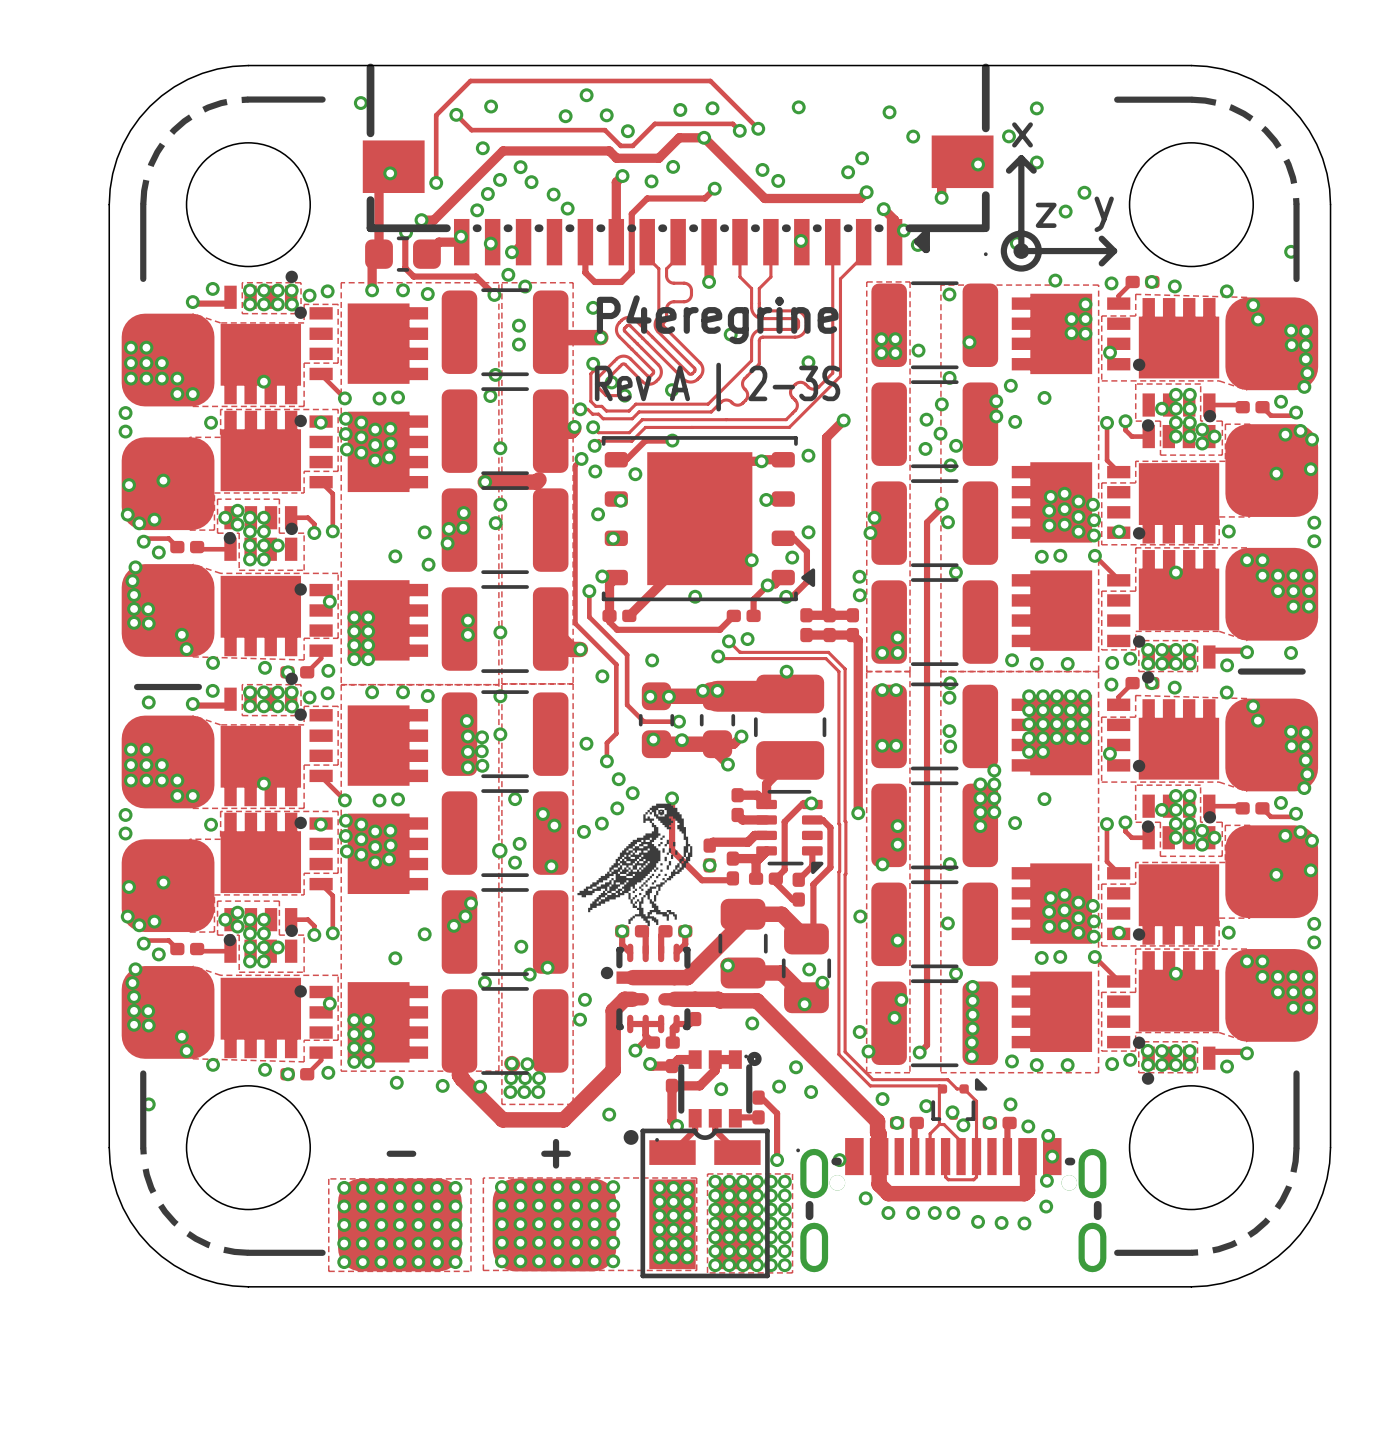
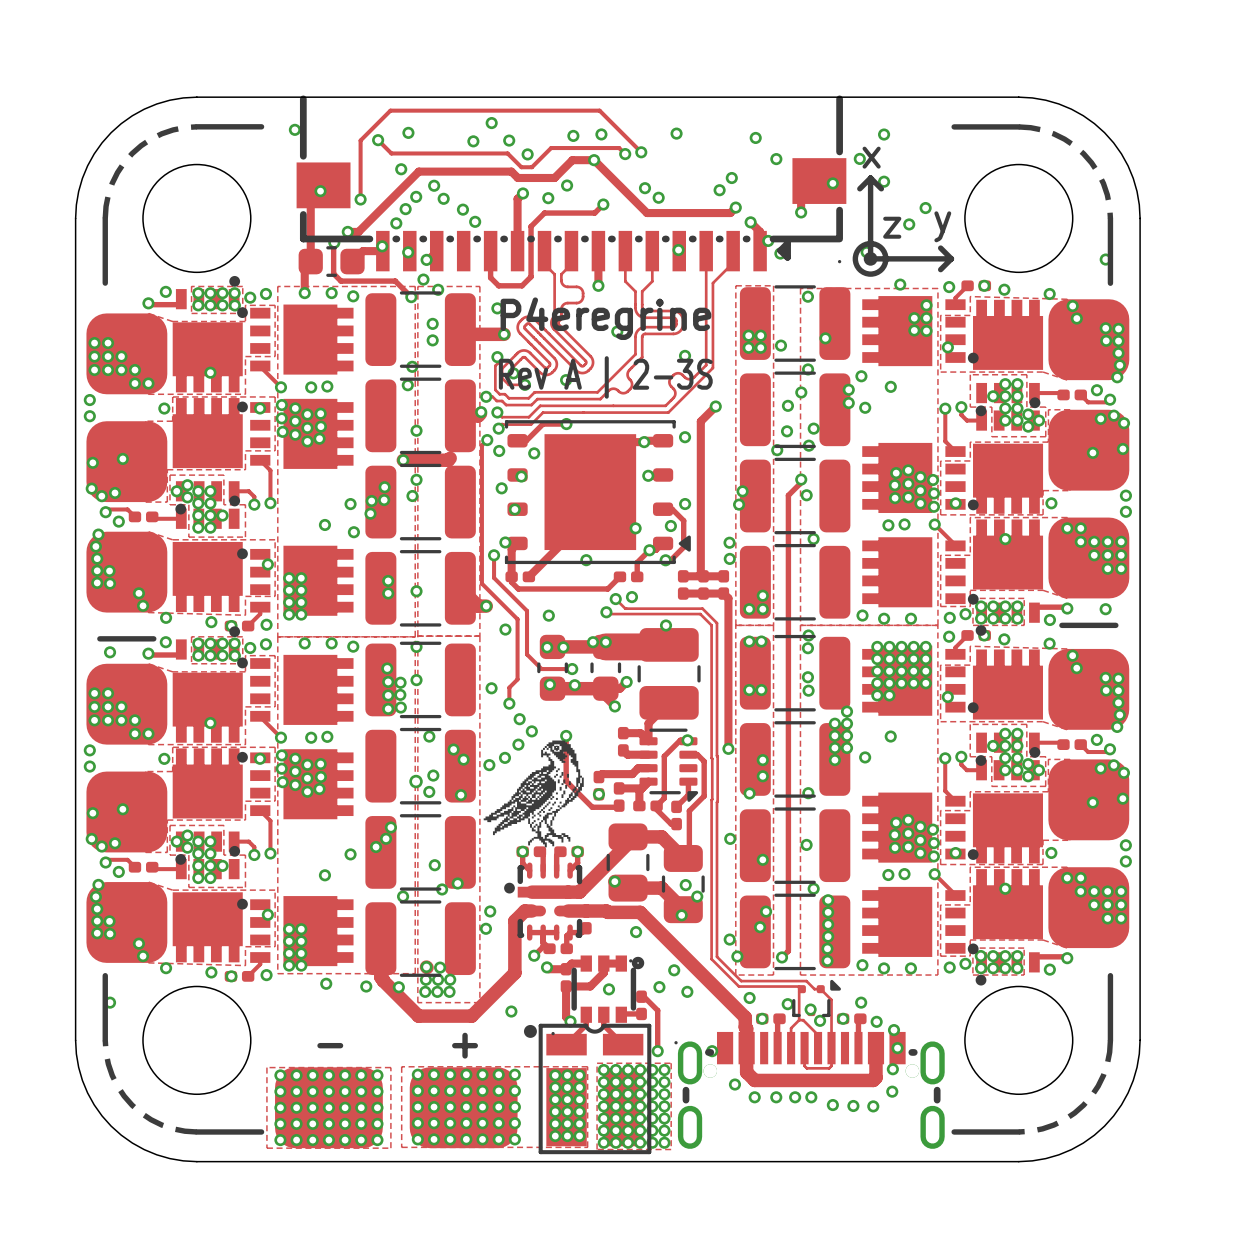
via position: (940, 433) -> (777, 450)

